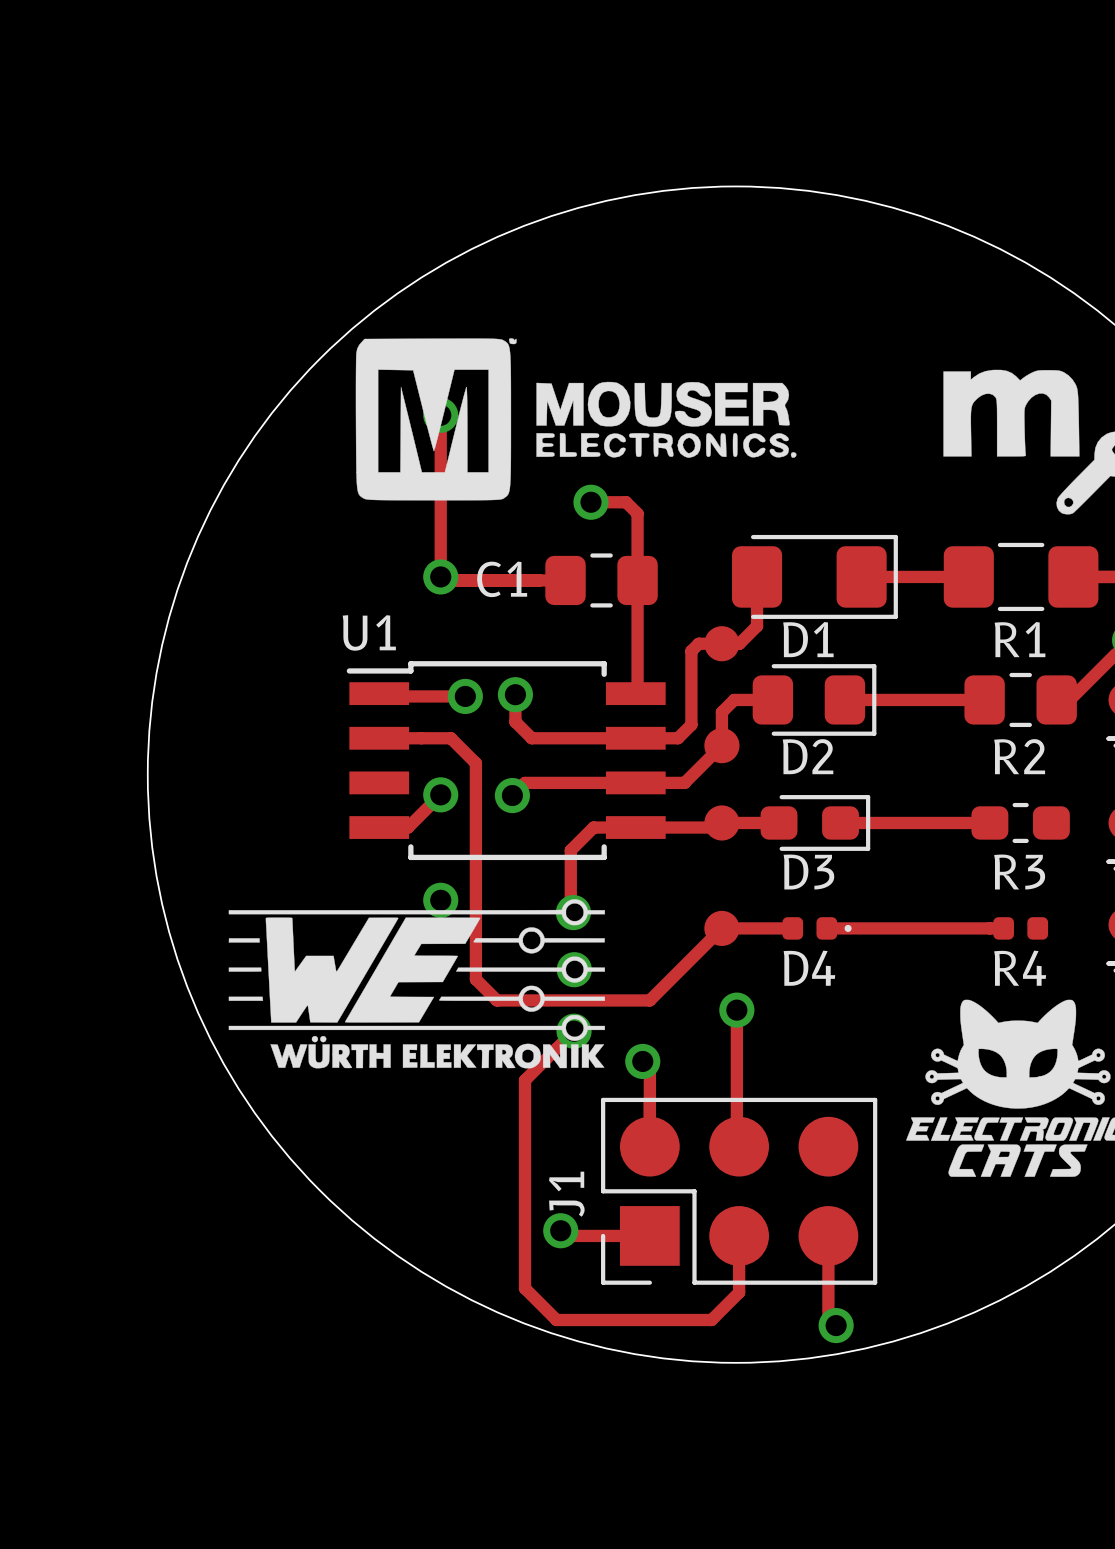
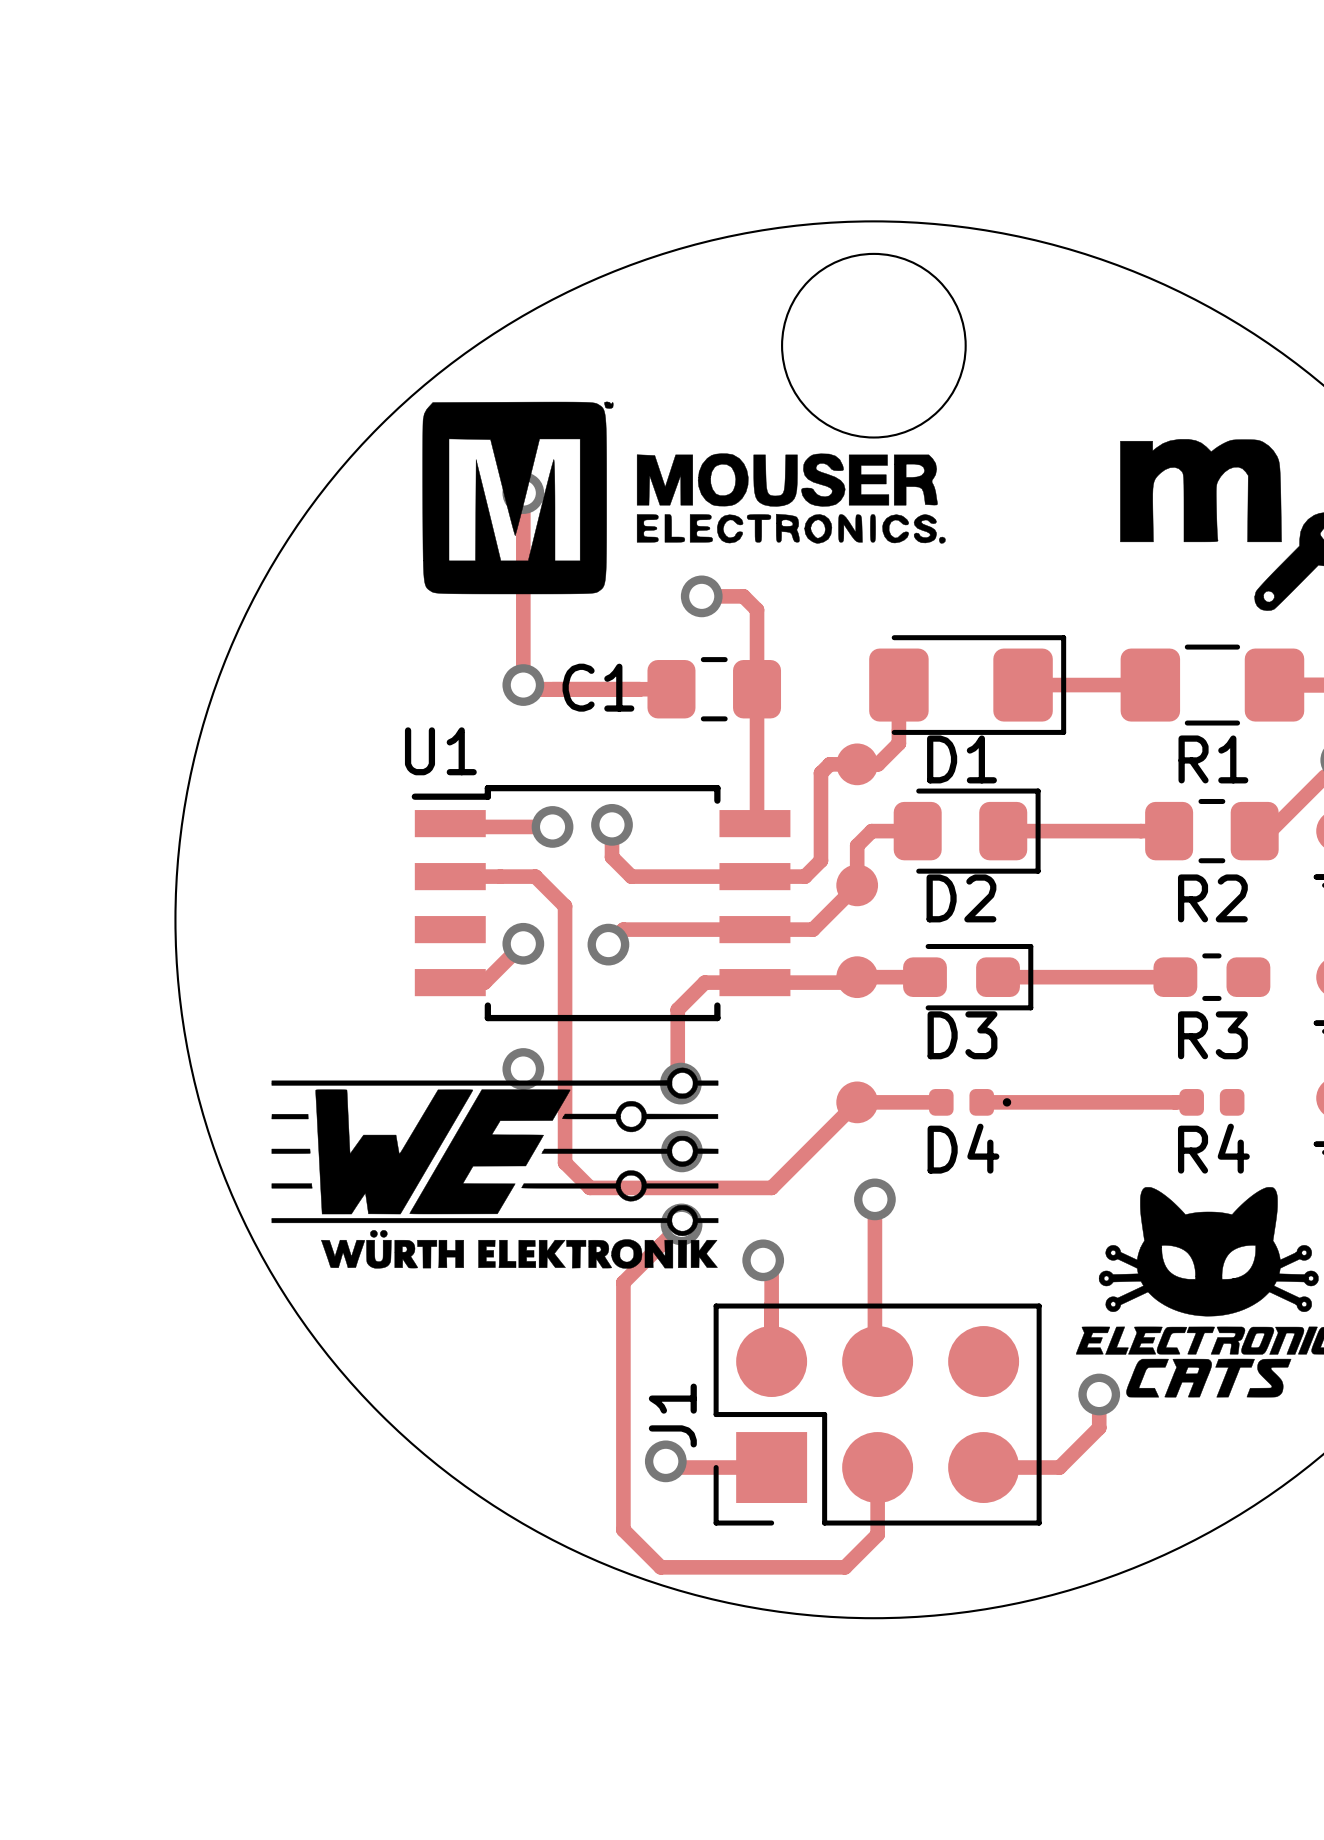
round board edge: none -> [781, 252, 967, 439]
track: (828, 1235) (828, 1317) (836, 1325) -> (983, 1467) (1059, 1467) (1099, 1427) (1099, 1394)
via position: (836, 1325) -> (1099, 1394)

